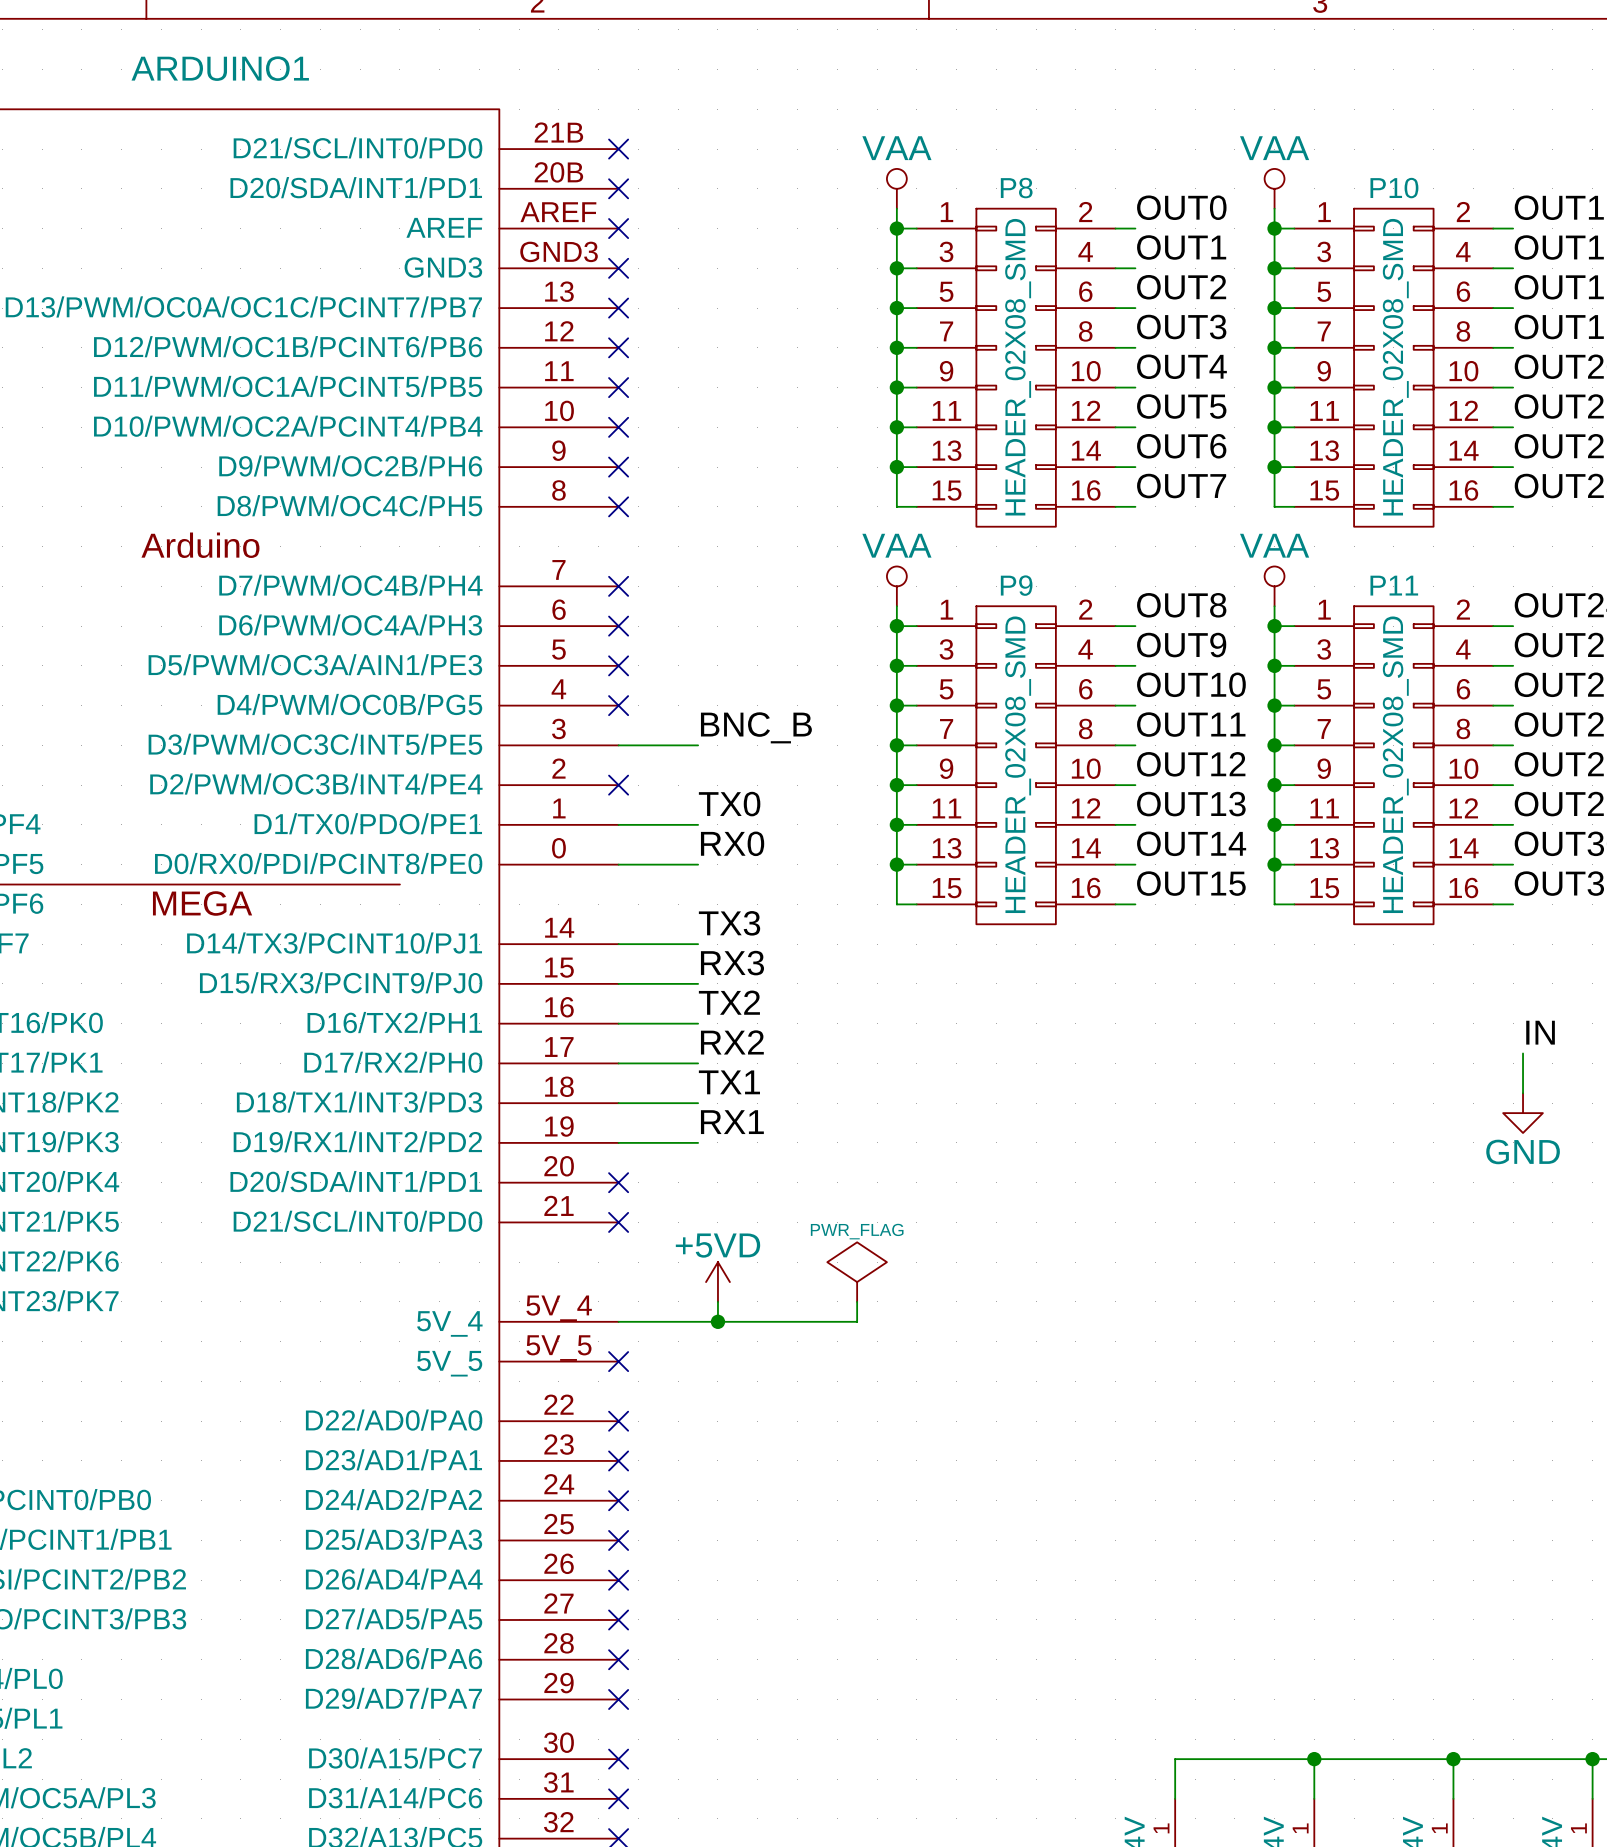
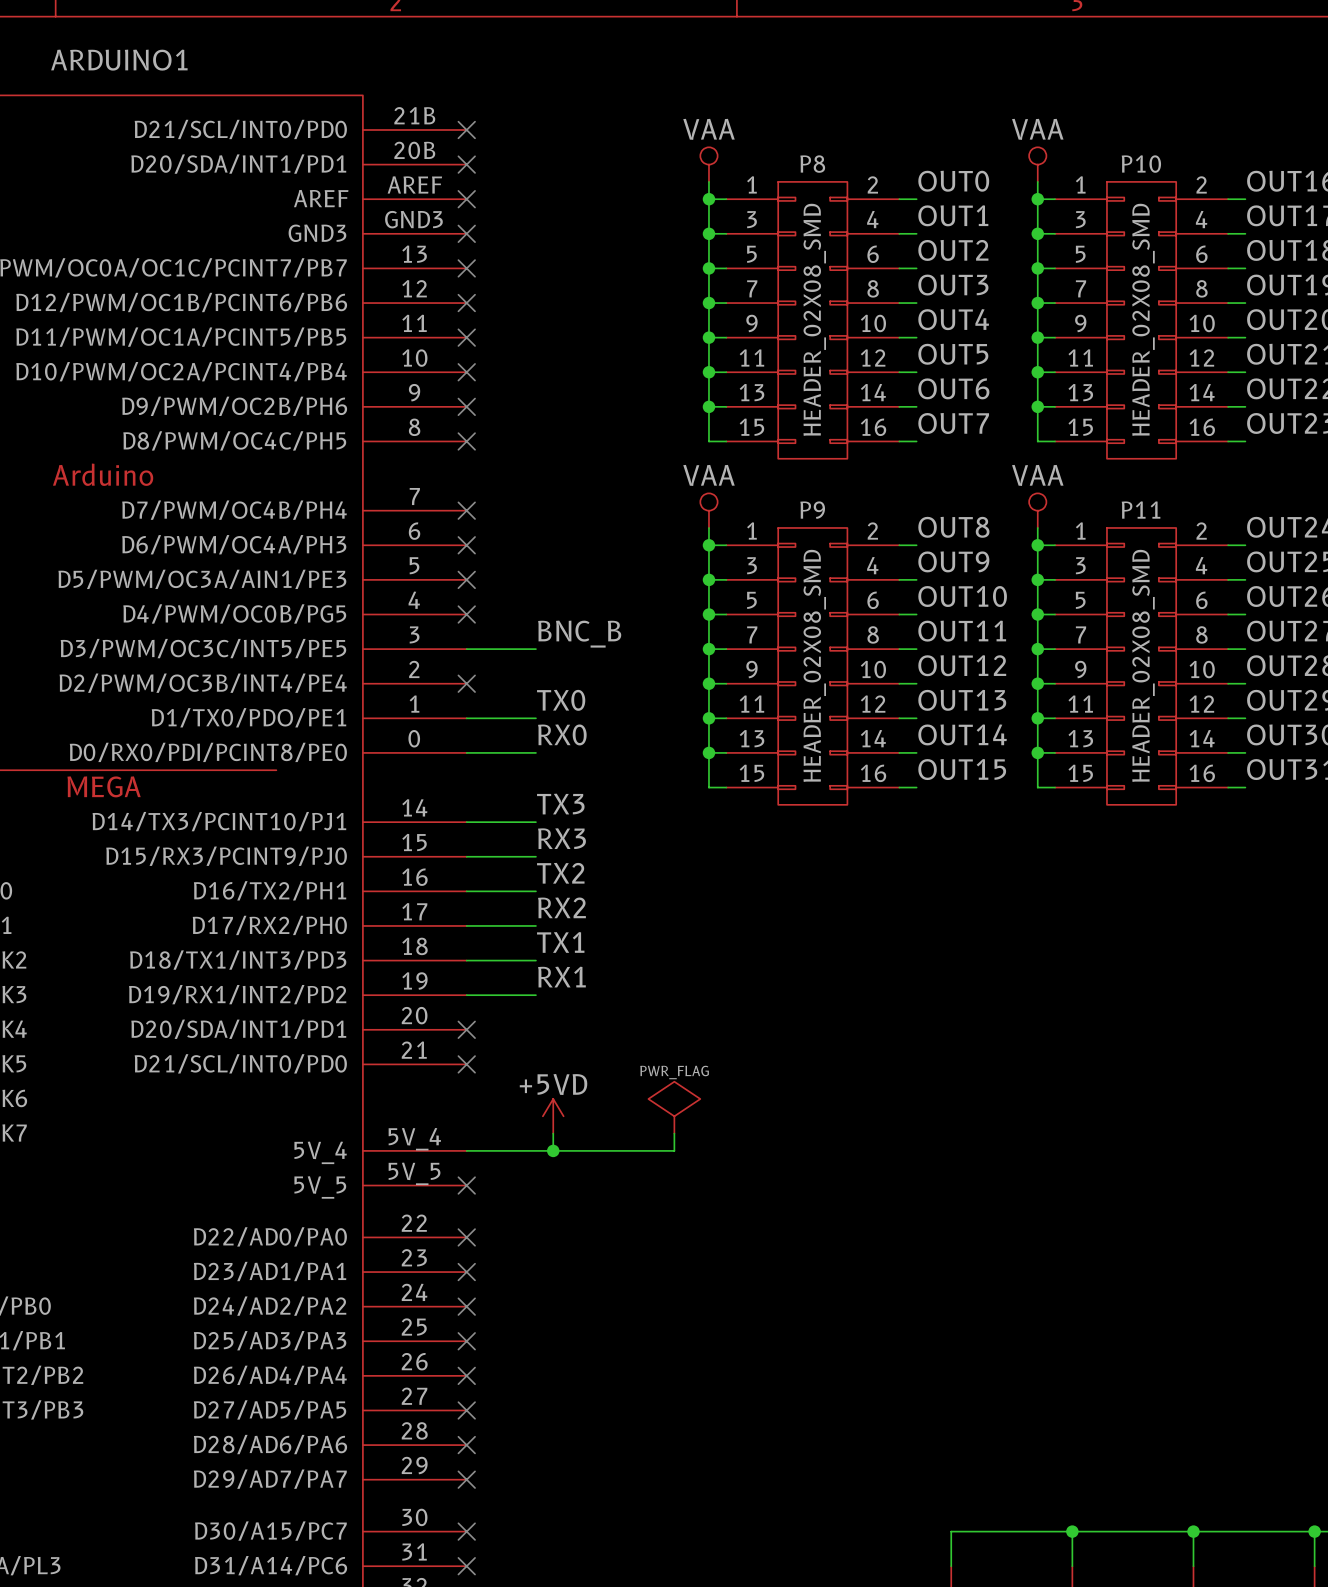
label: IN (1540, 1032) -> none
wire: (1523, 1053) (1523, 1093) -> none
power symbol: GND (1523, 1113) -> none

